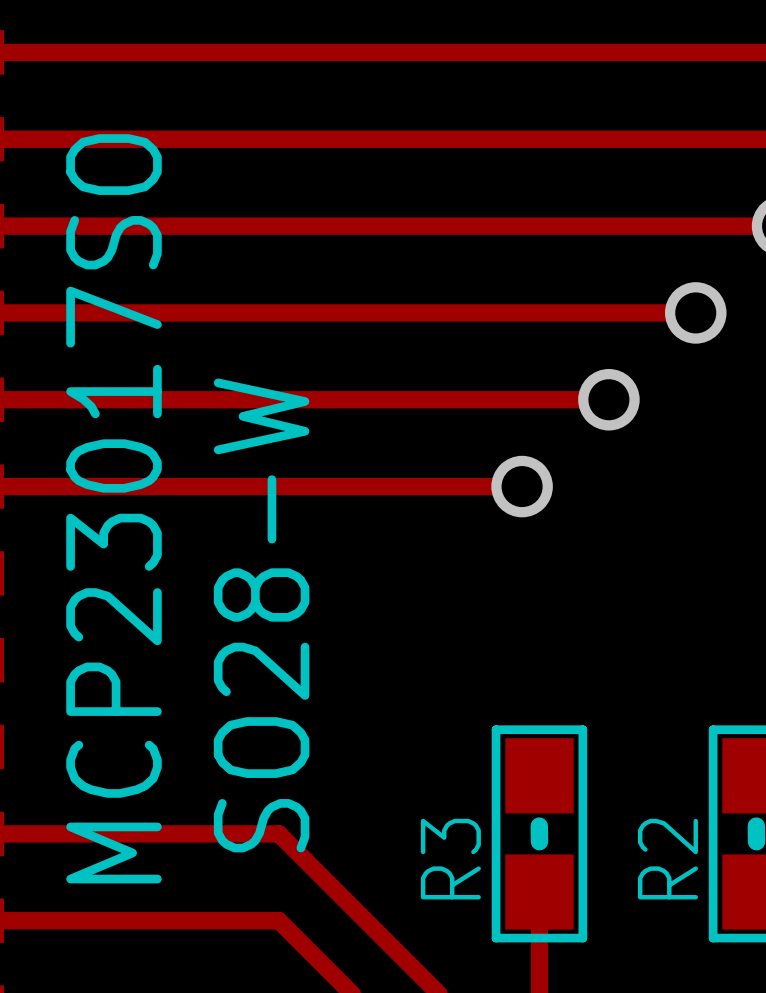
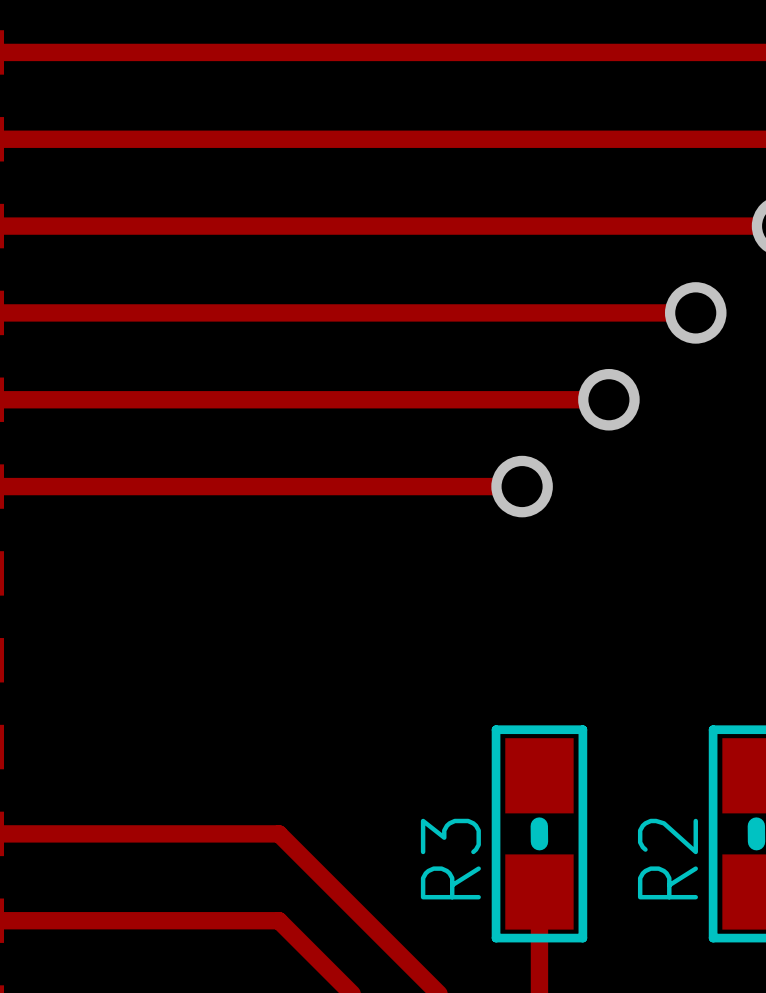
text: MCP23017SO (114, 508) -> none
text: SO28-W (261, 615) -> none

